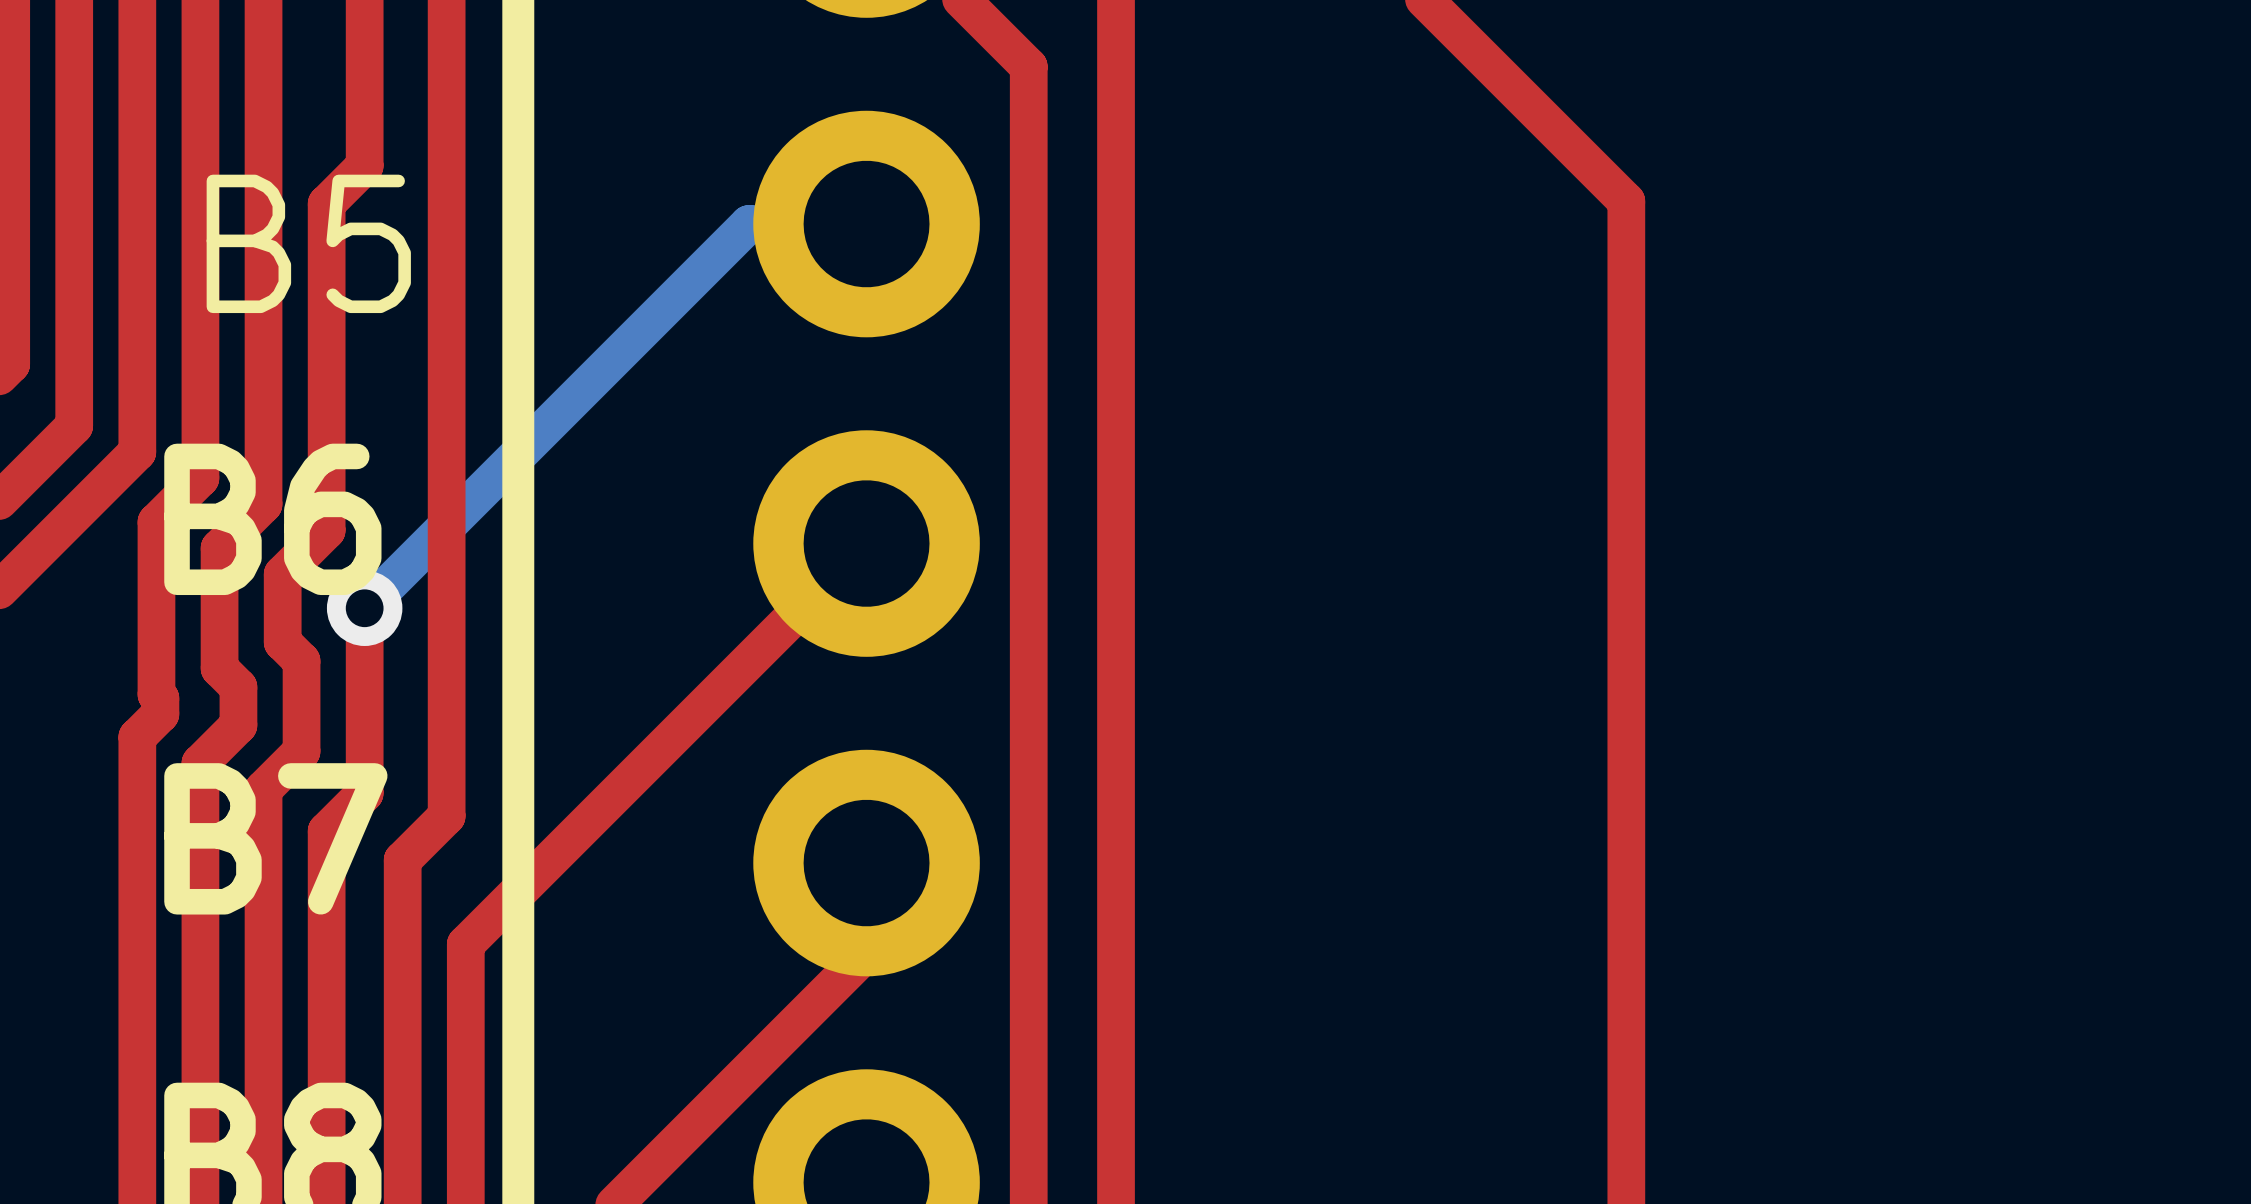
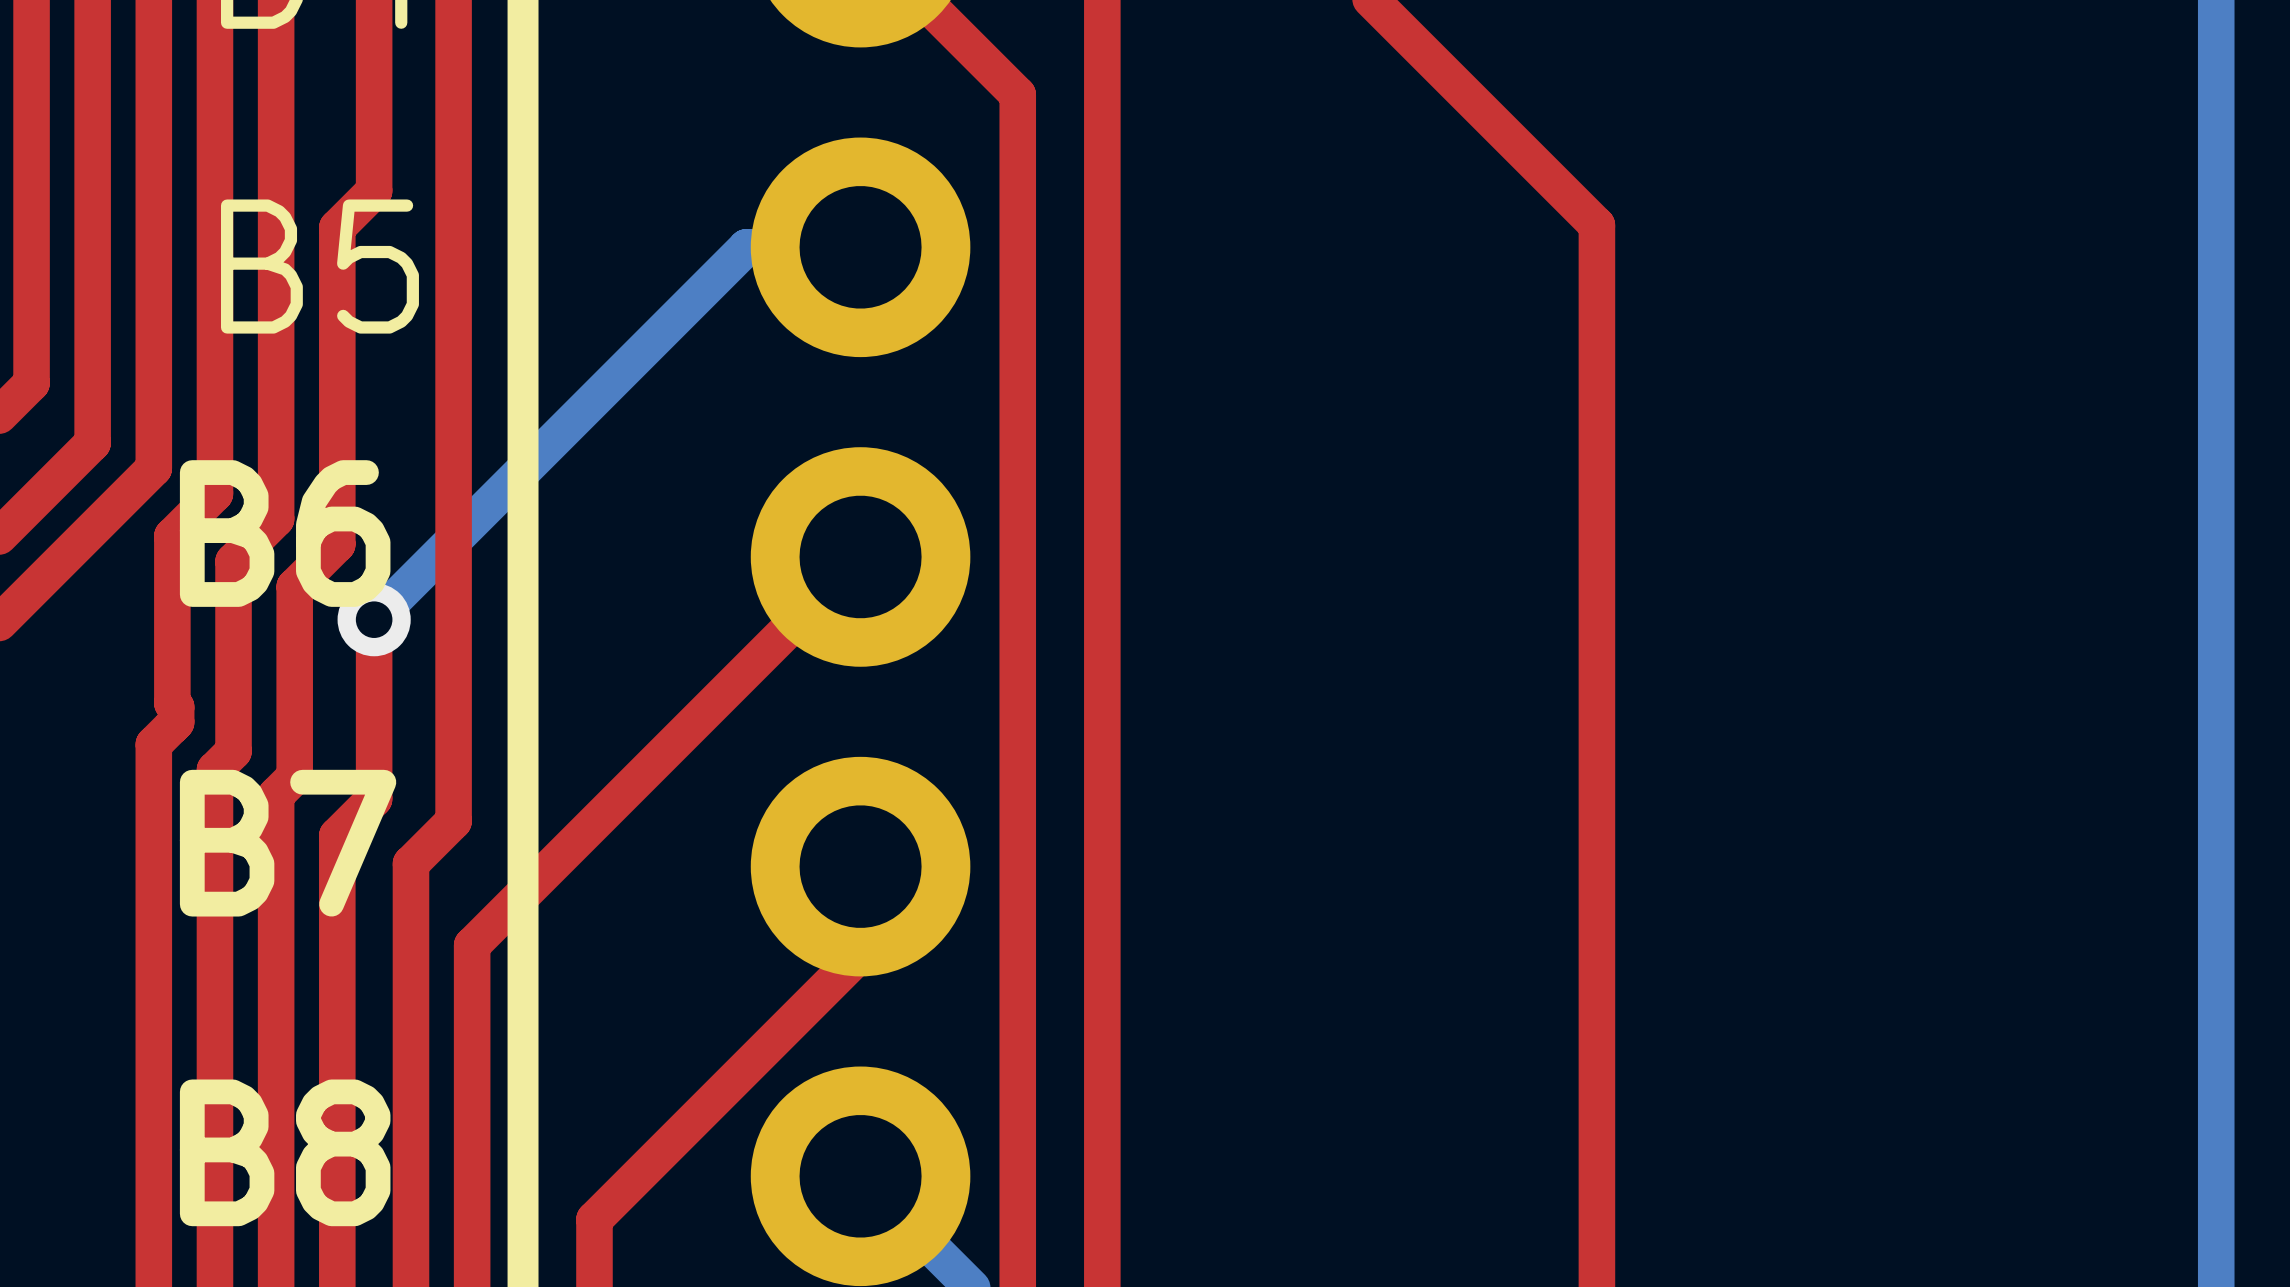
top track: (282, 642) (301, 661) (301, 751) (282, 770) -> (294, 652) (294, 776)
top track: (219, 668) (238, 687) (238, 725) (219, 744) -> (233, 677) (233, 751)

